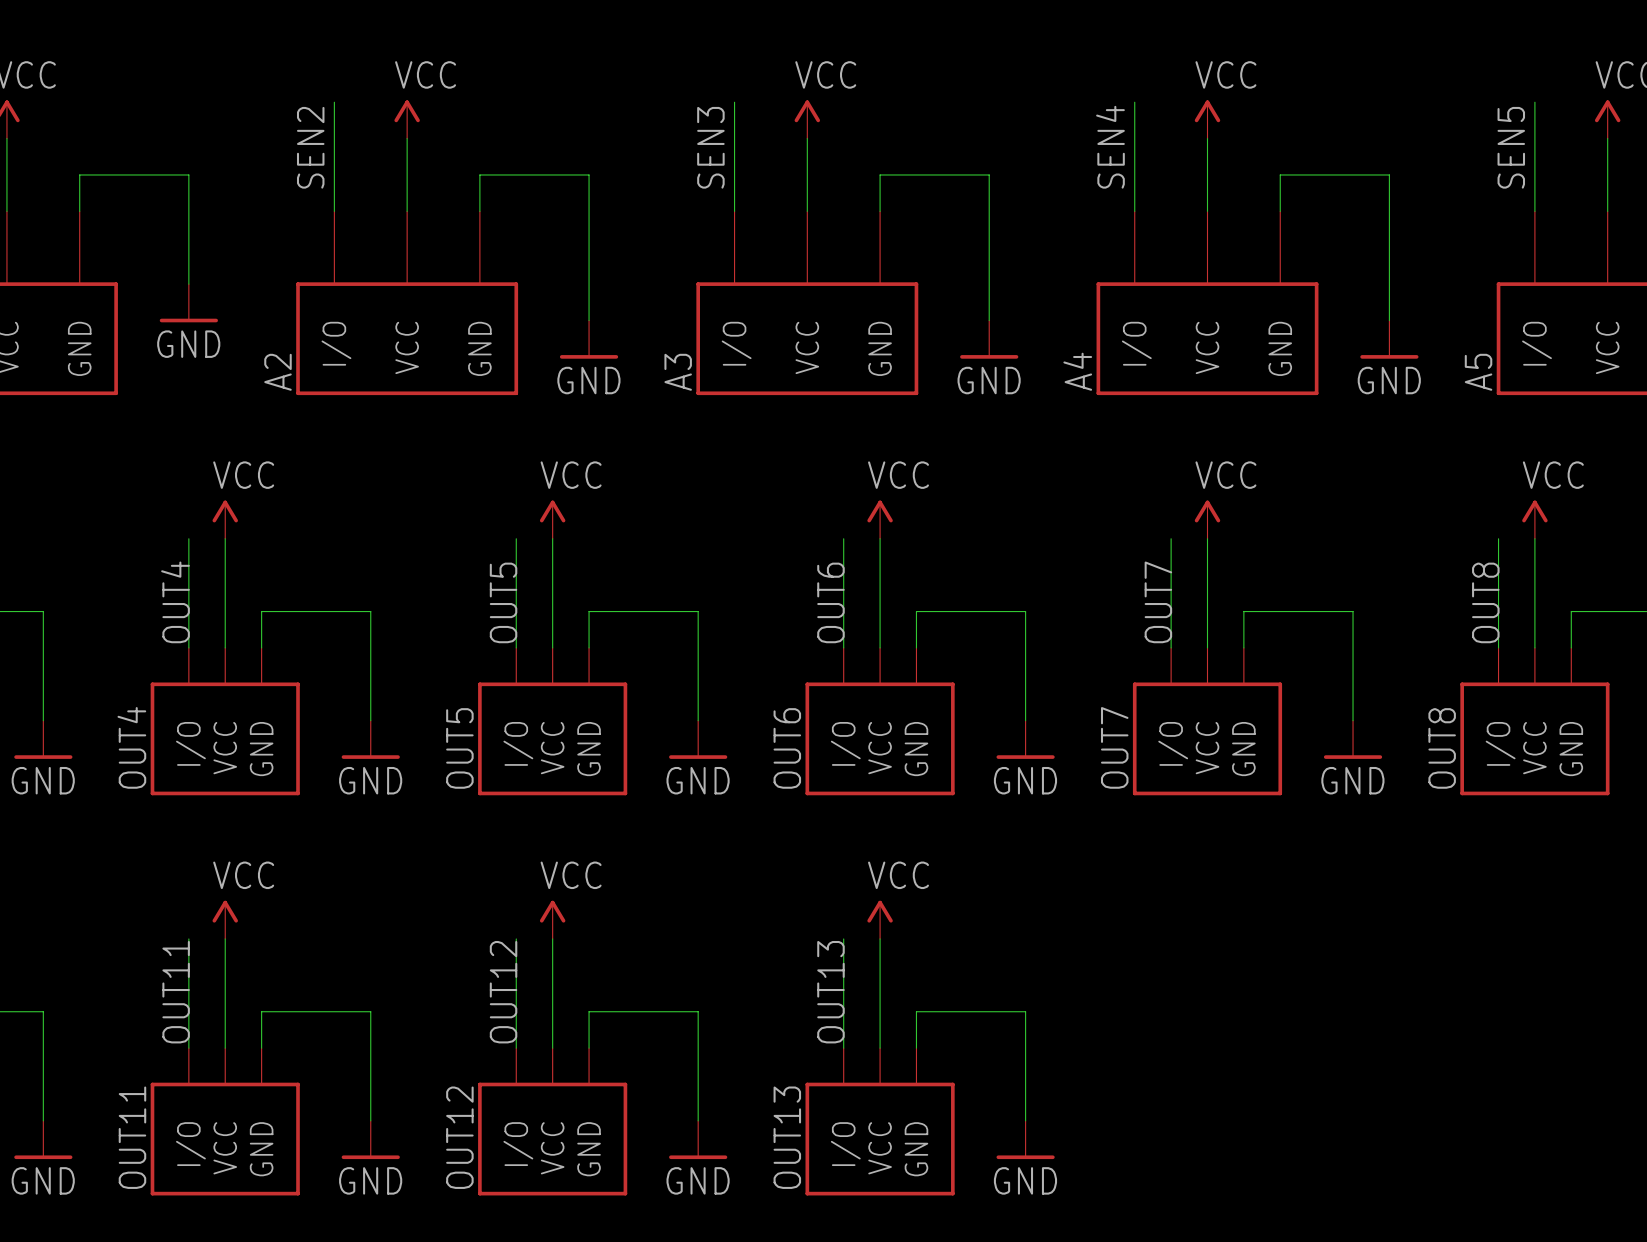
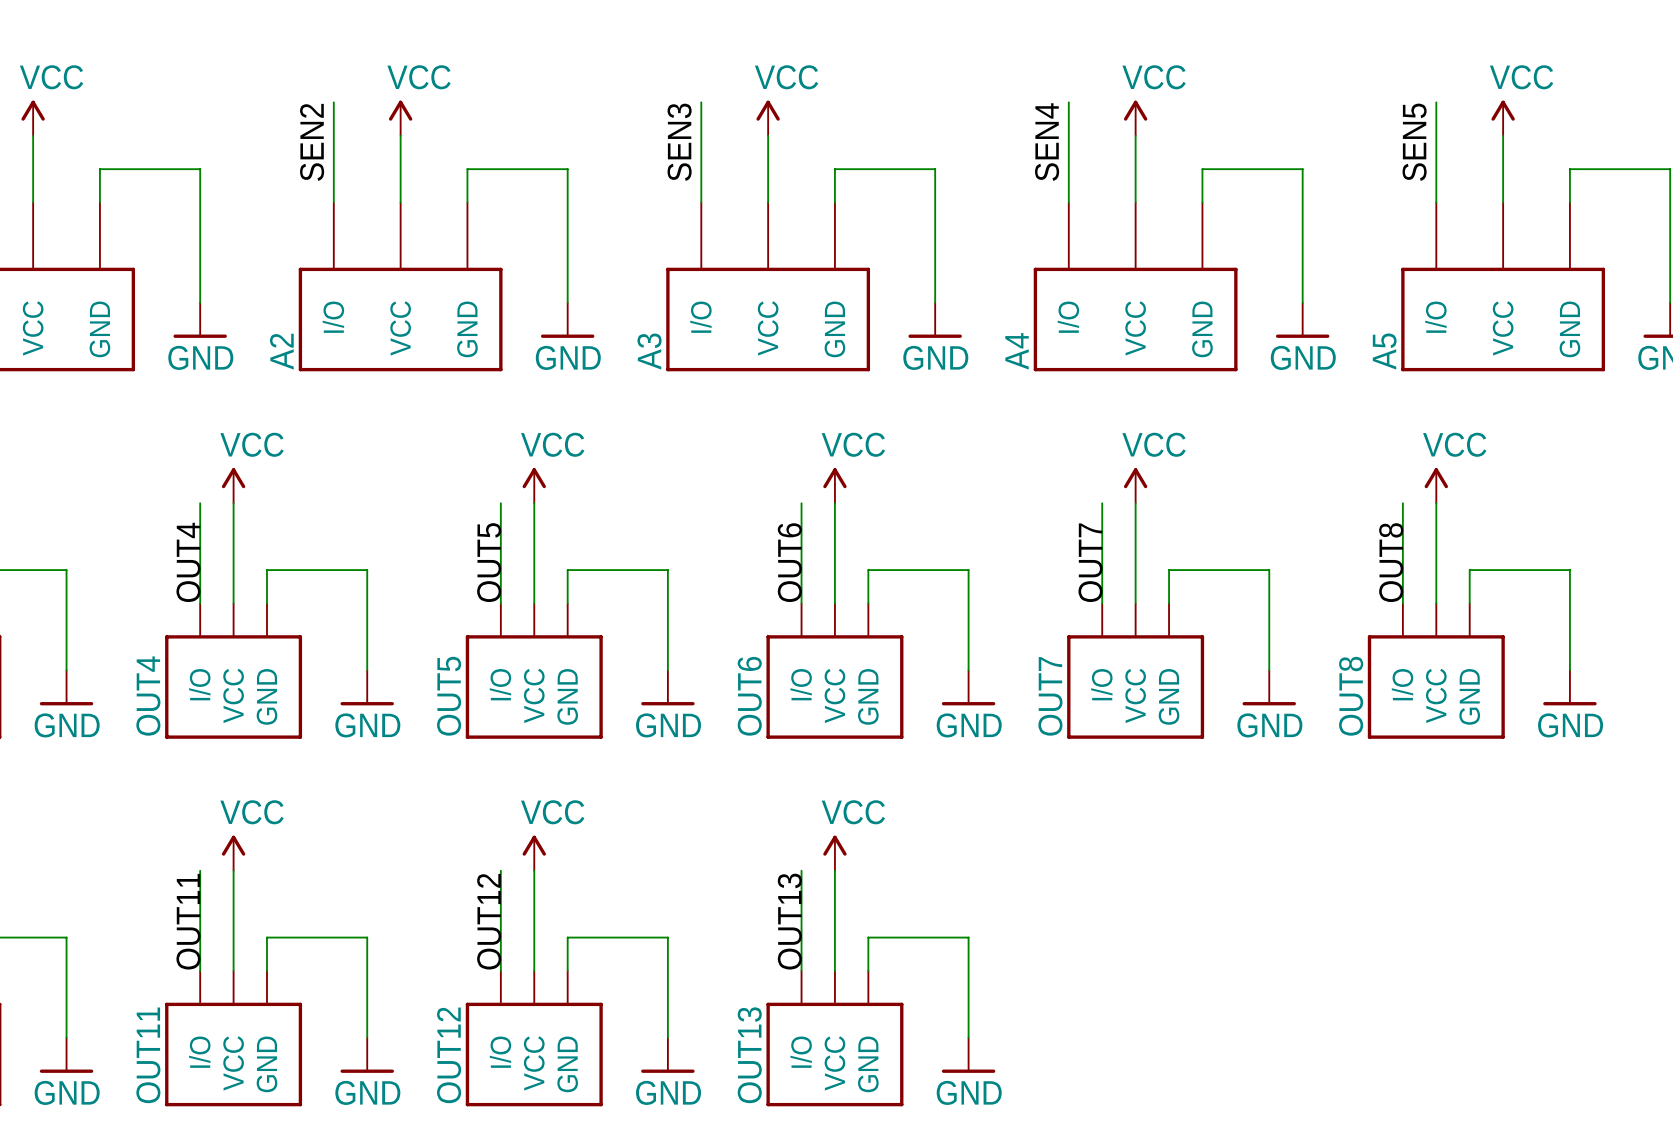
power symbol position: GND (188, 303) -> GND (200, 320)

